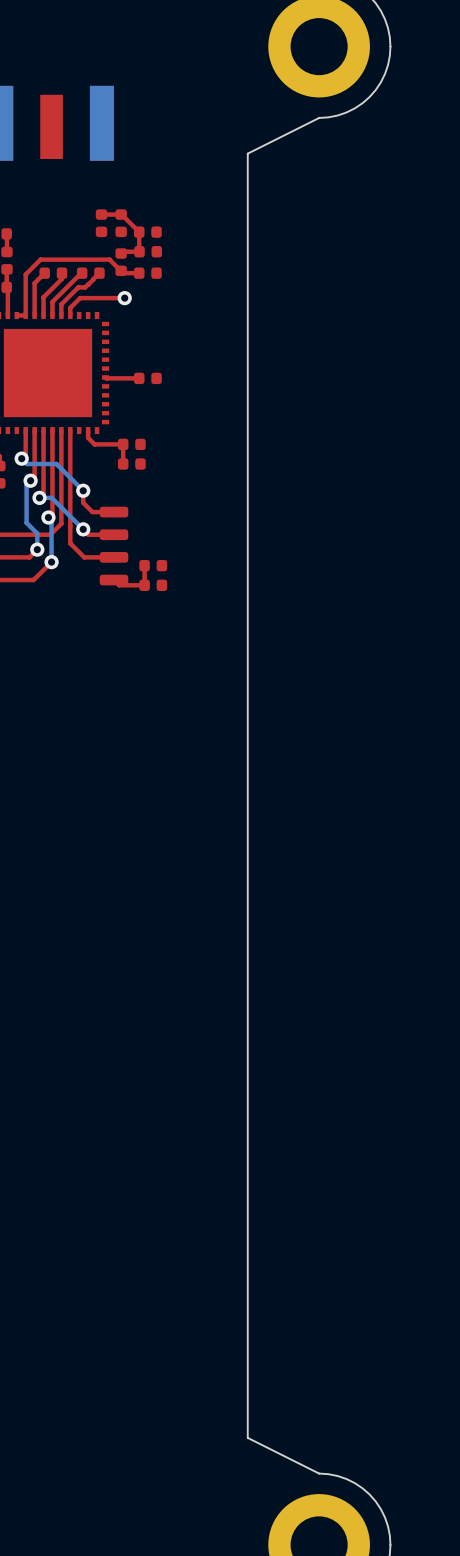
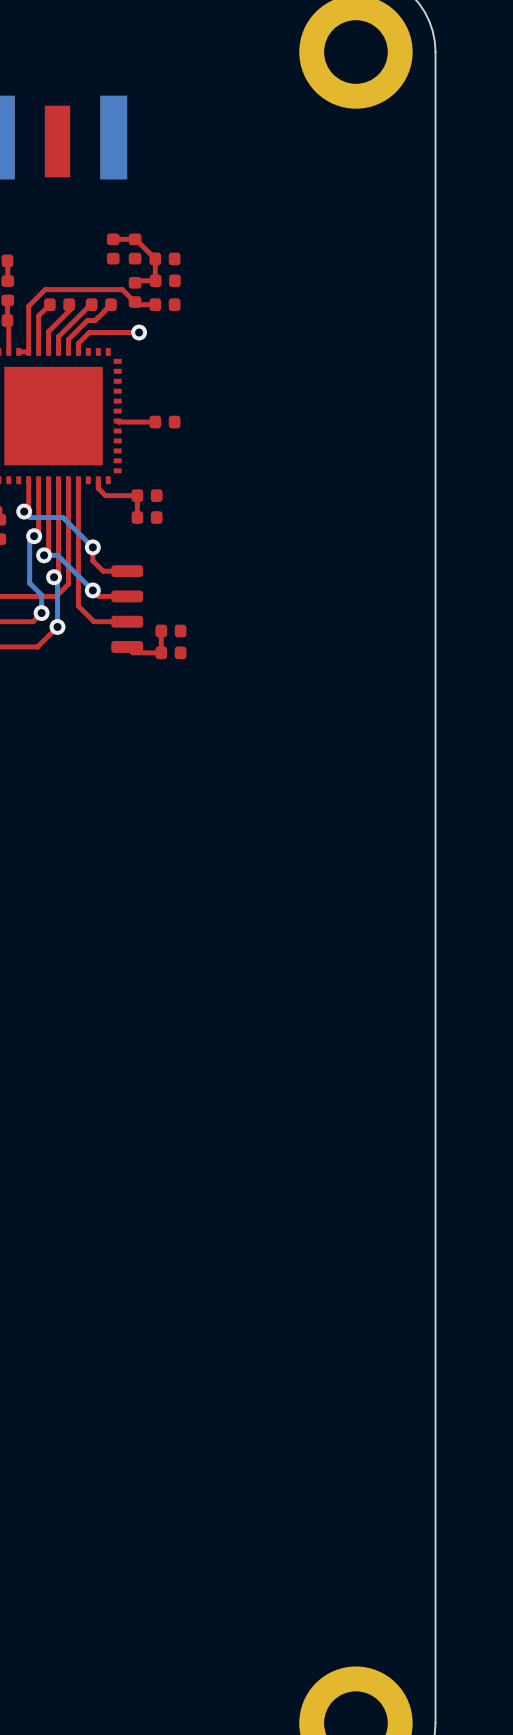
board edge: (390, 46) (385, 73) (375, 90) (362, 103) (346, 112) (319, 117) (247, 153) (247, 1437) (319, 1473) (346, 1478) (362, 1488) (375, 1501) (385, 1517) (390, 1544) -> (435, 52) (435, 1723)

